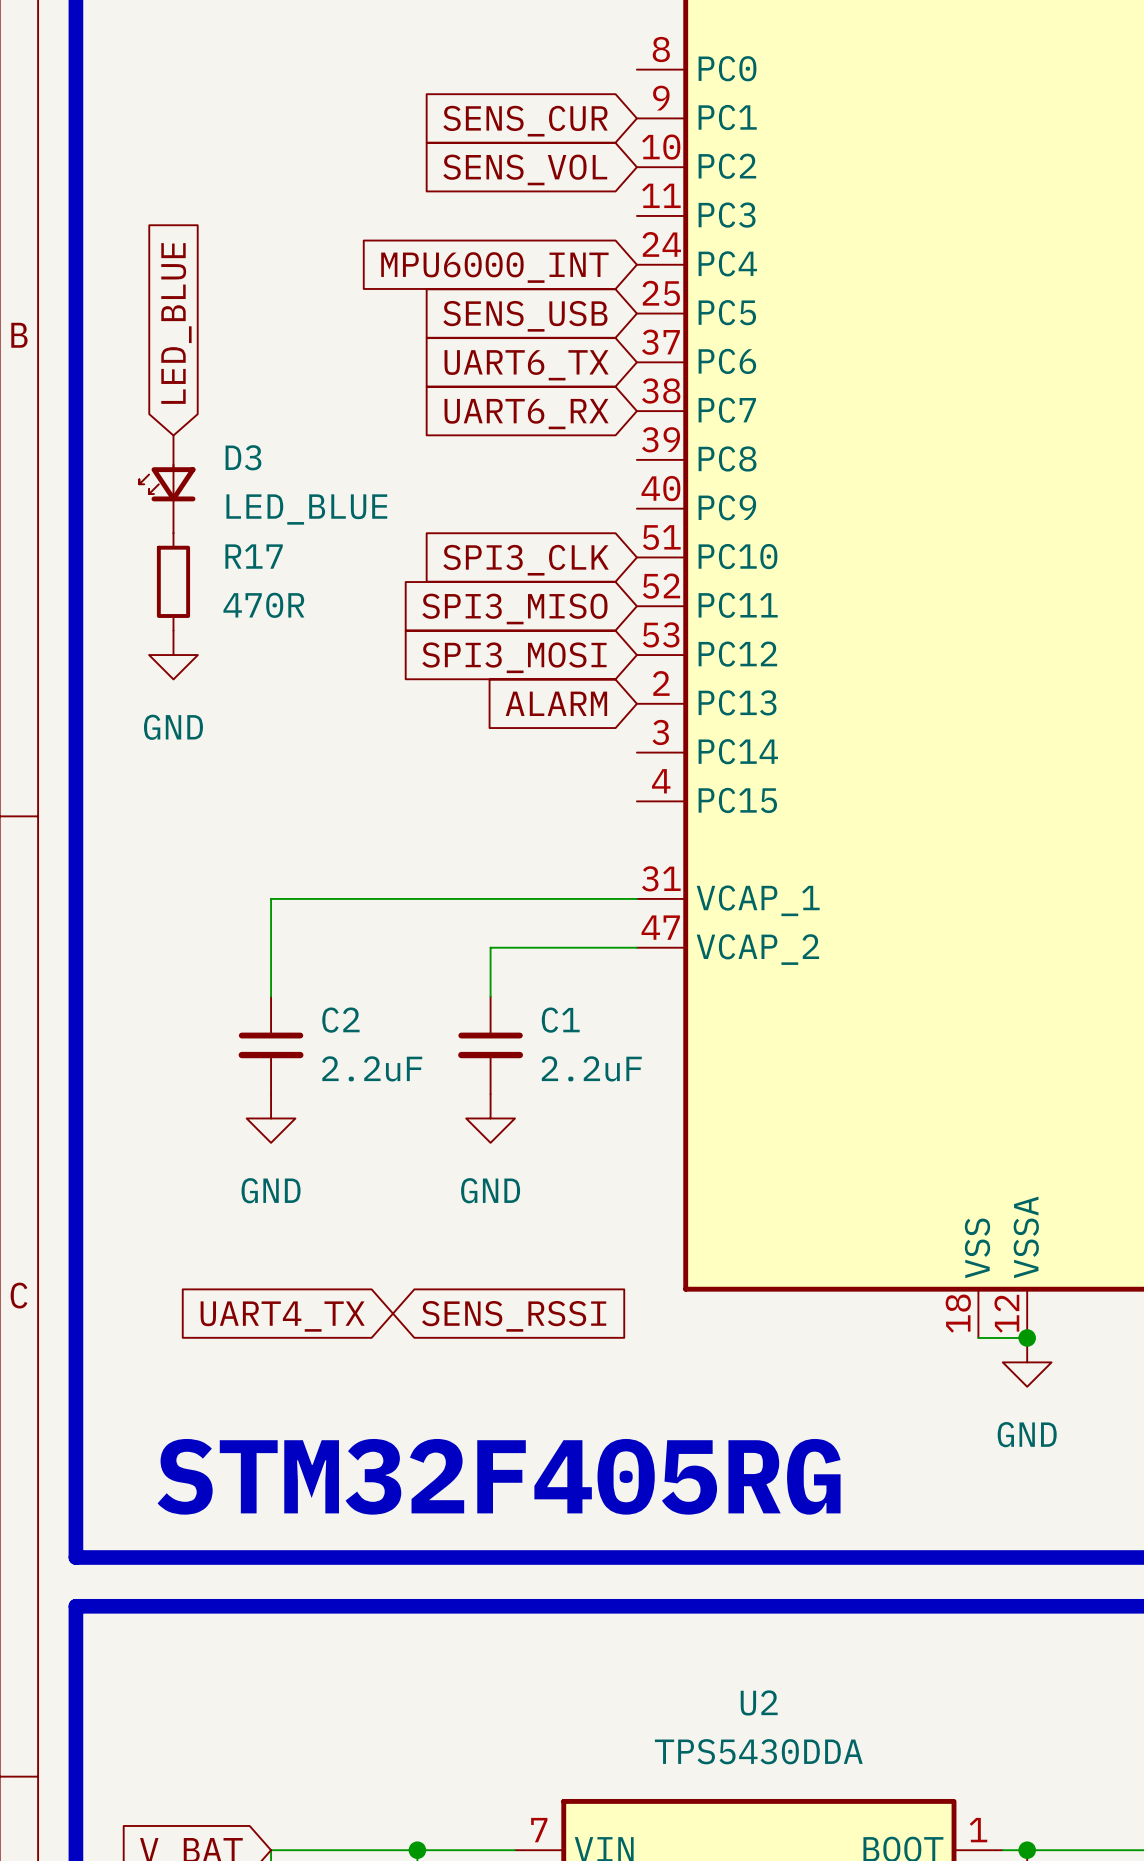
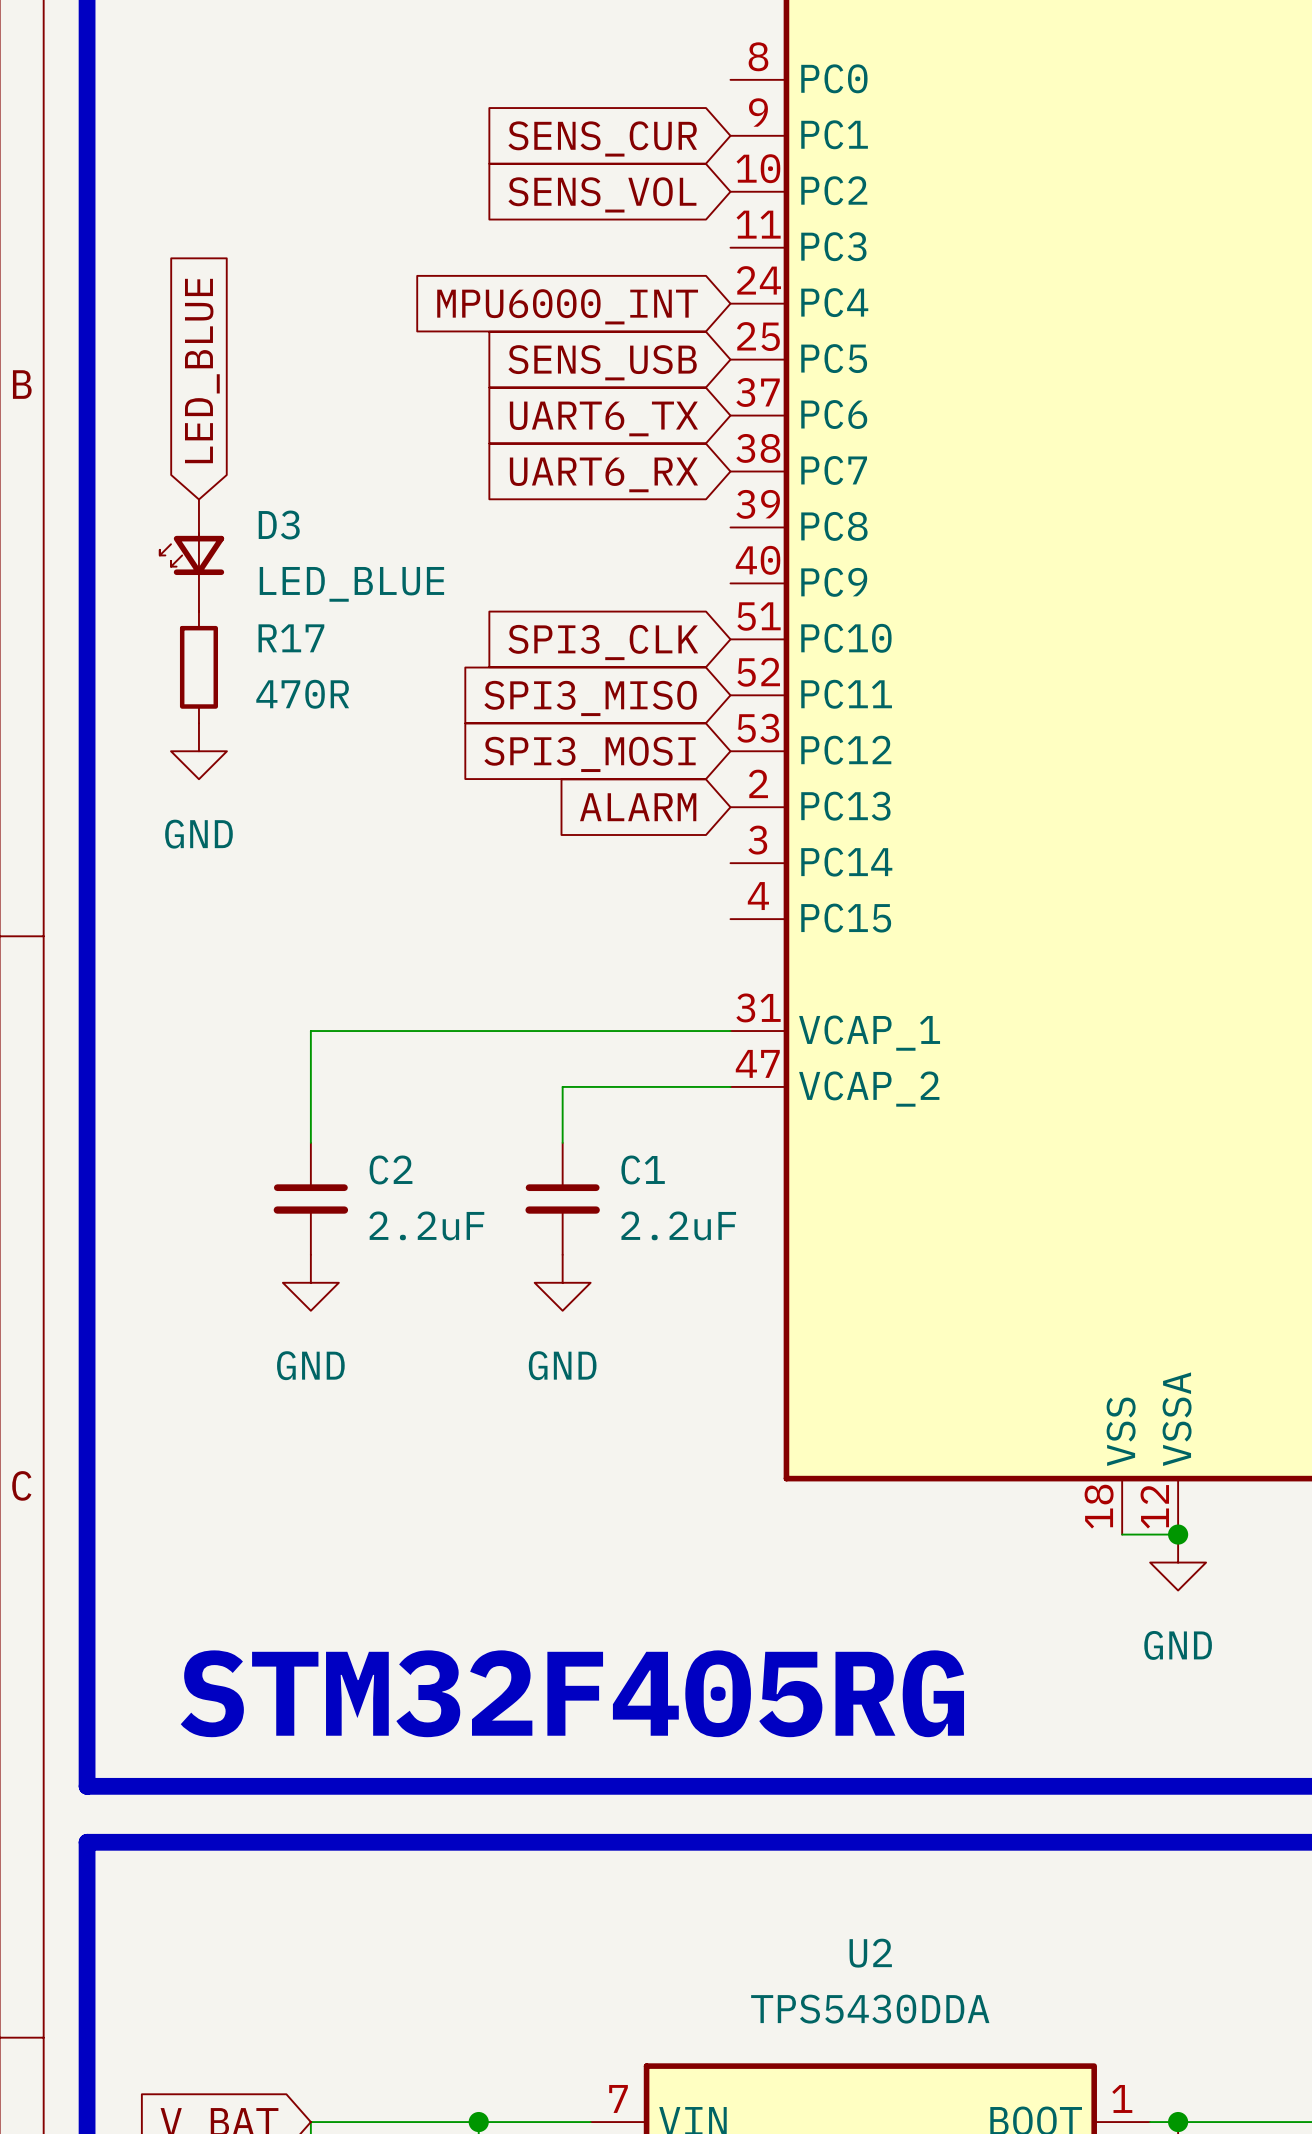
global label: UART4_TX (282, 1316) -> none
global label: SENS_RSSI (514, 1316) -> none

